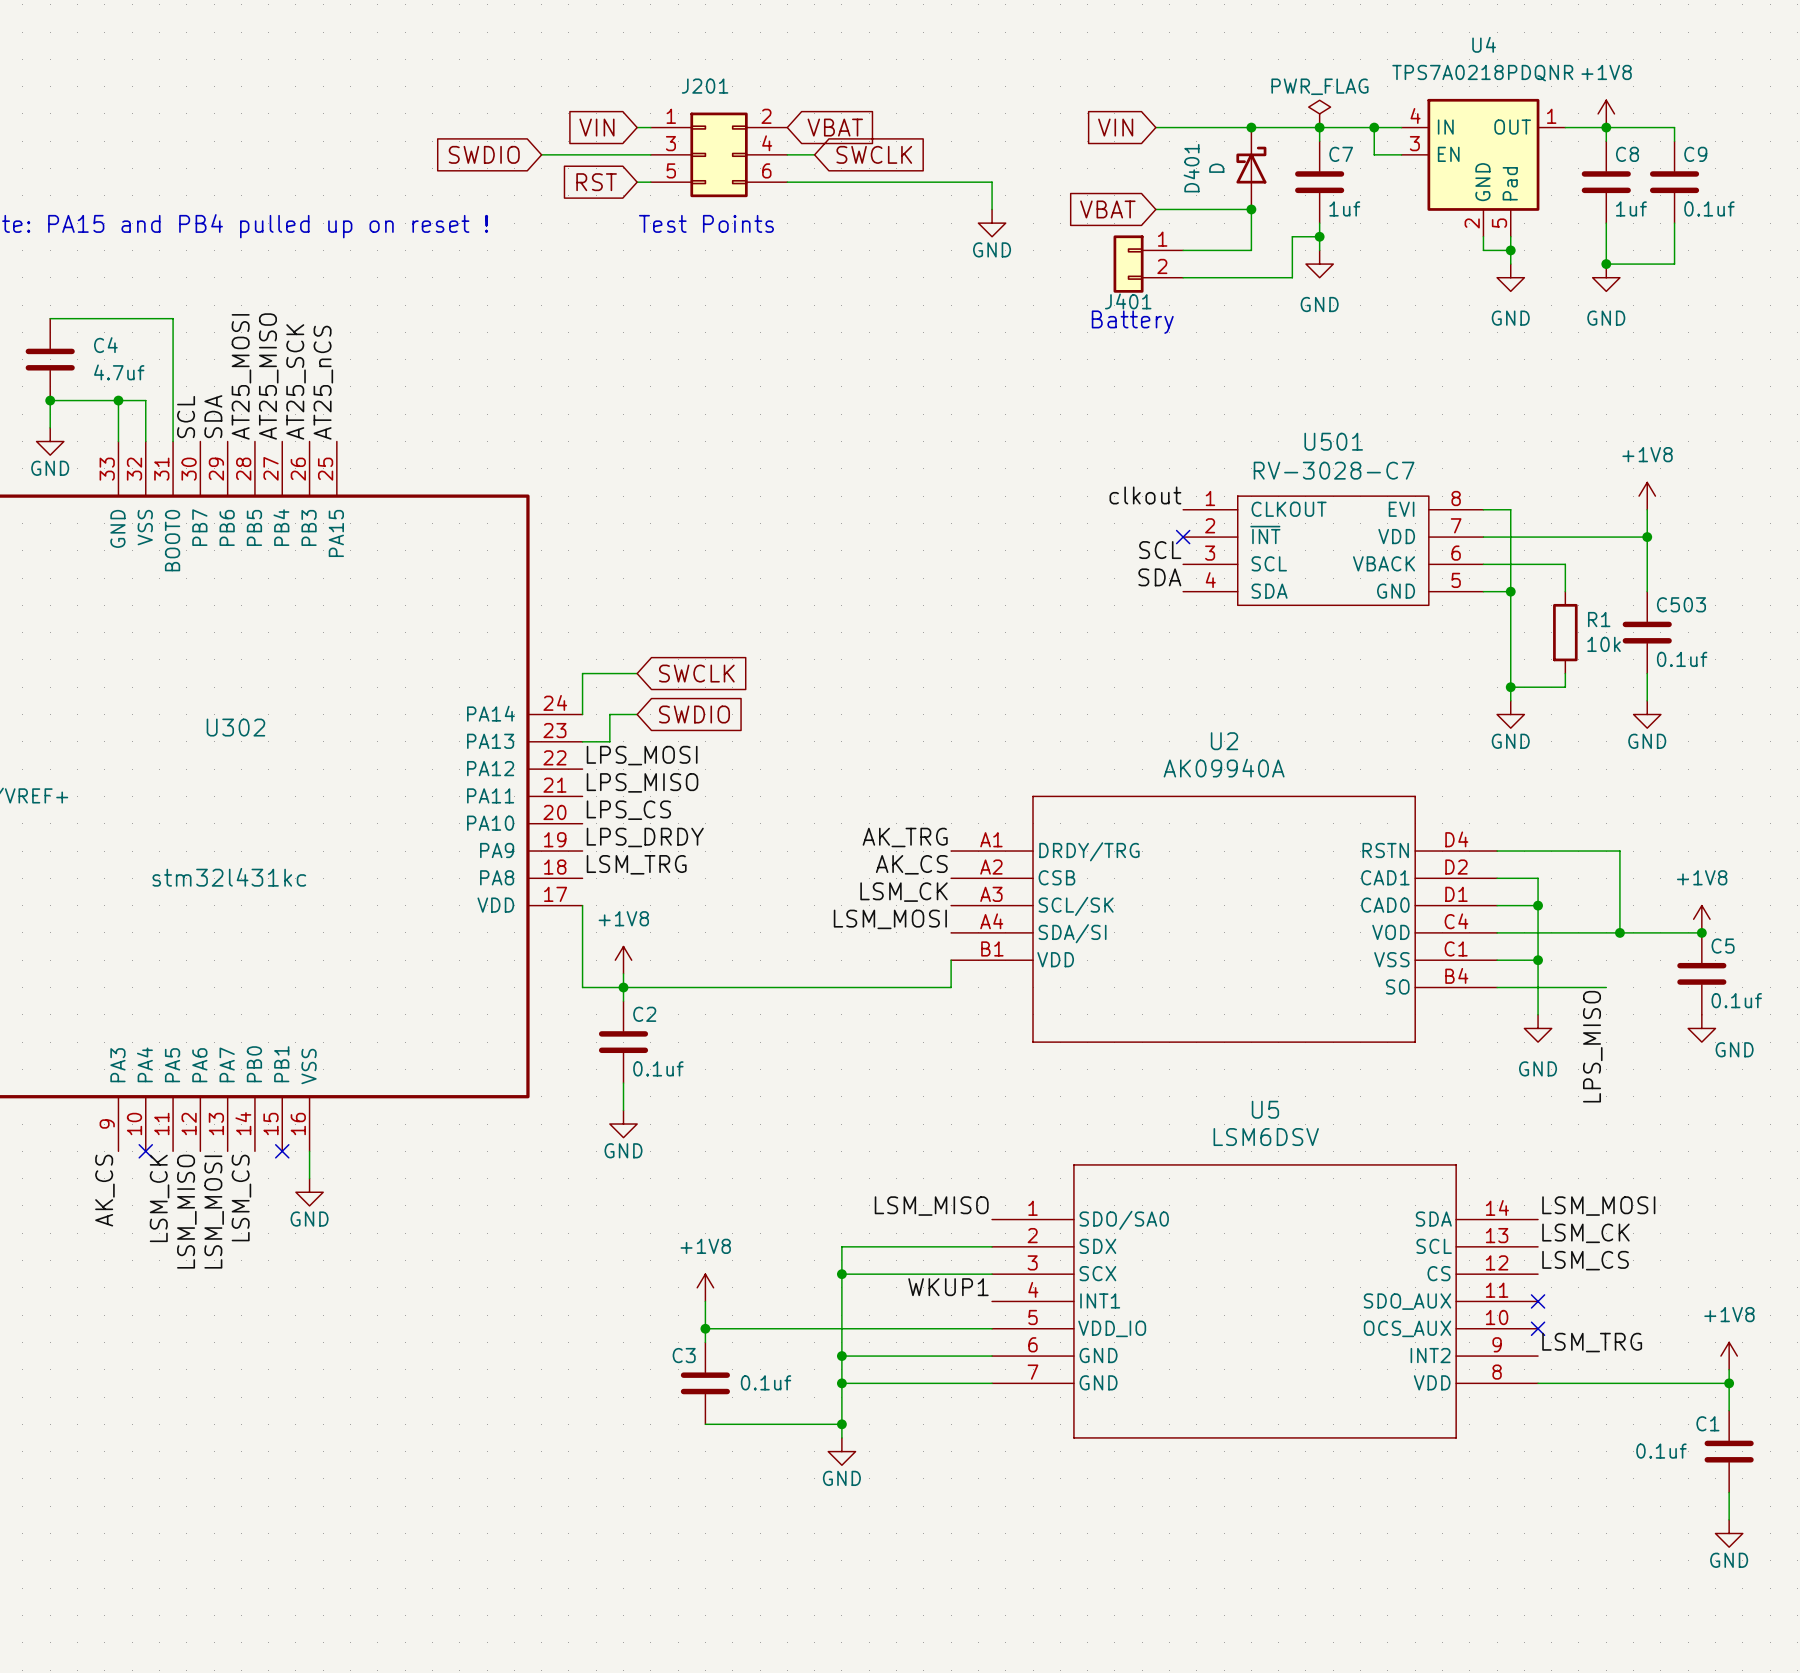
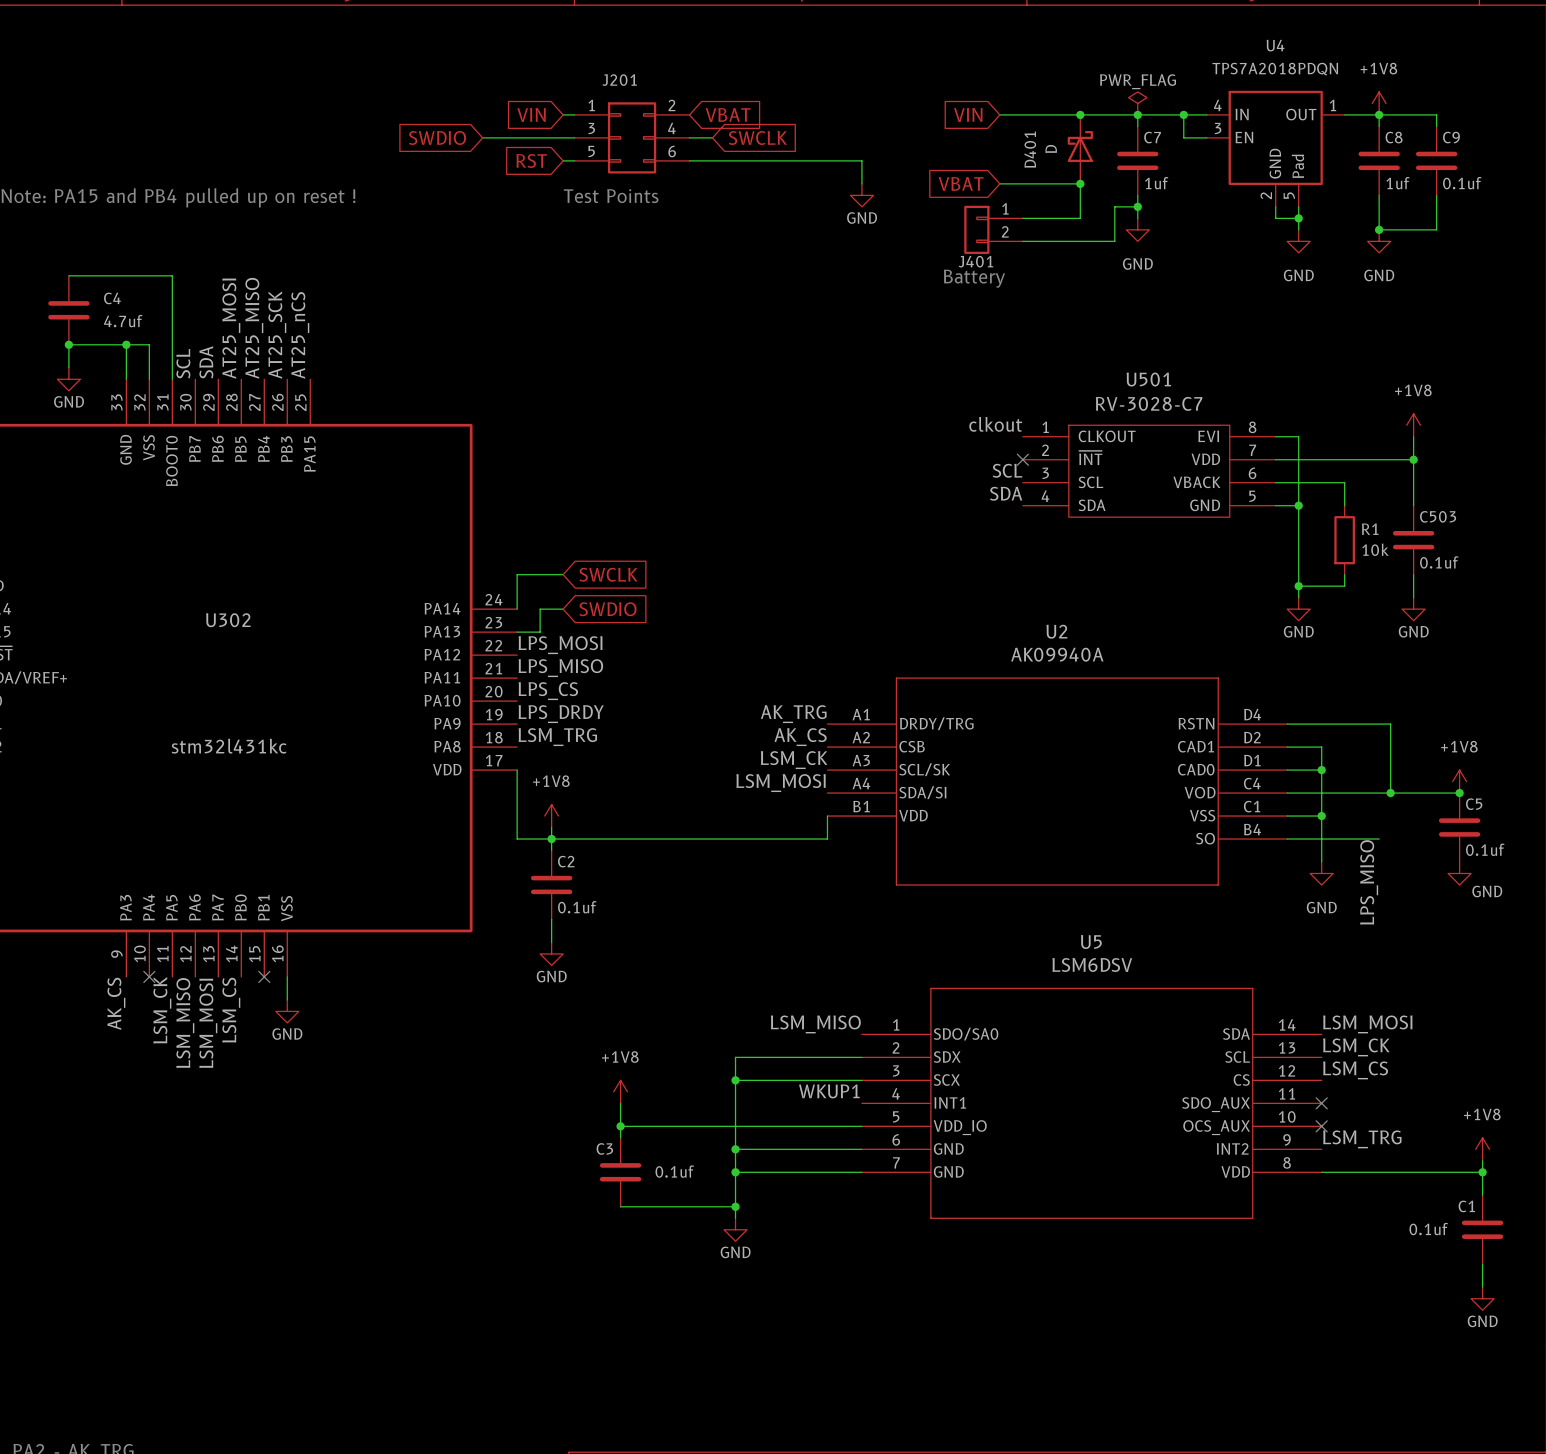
U4 value: TPS7A0218PDQNR (1482, 73) -> TPS7A2018PDQN (1275, 69)

